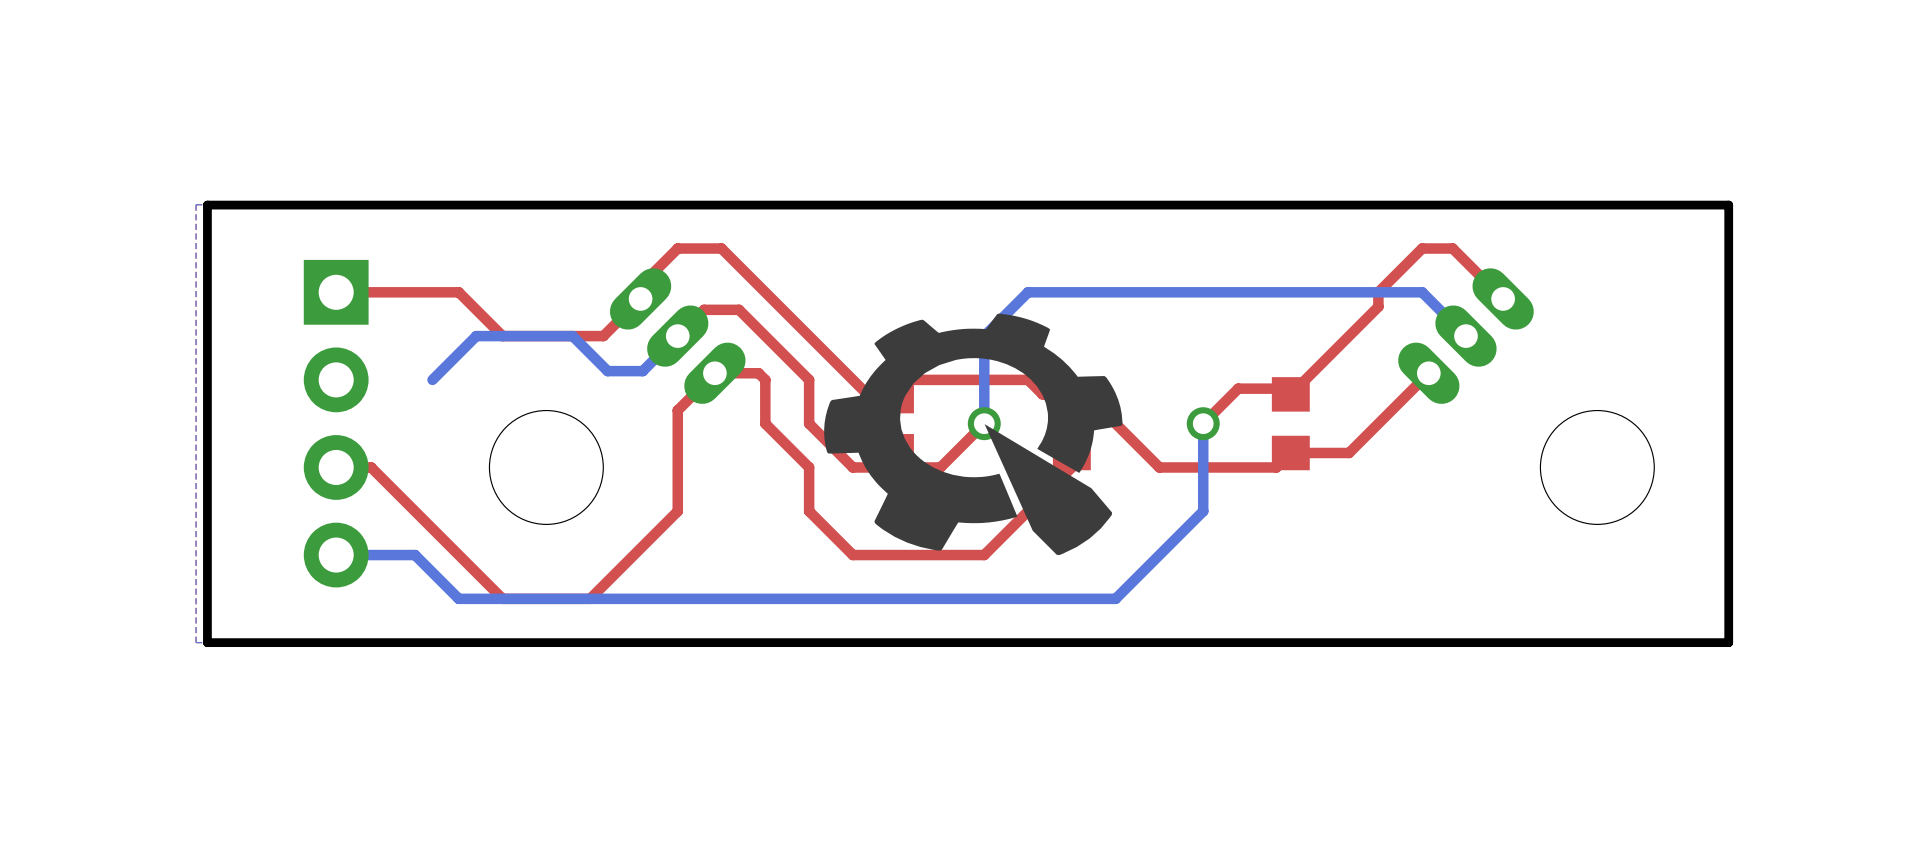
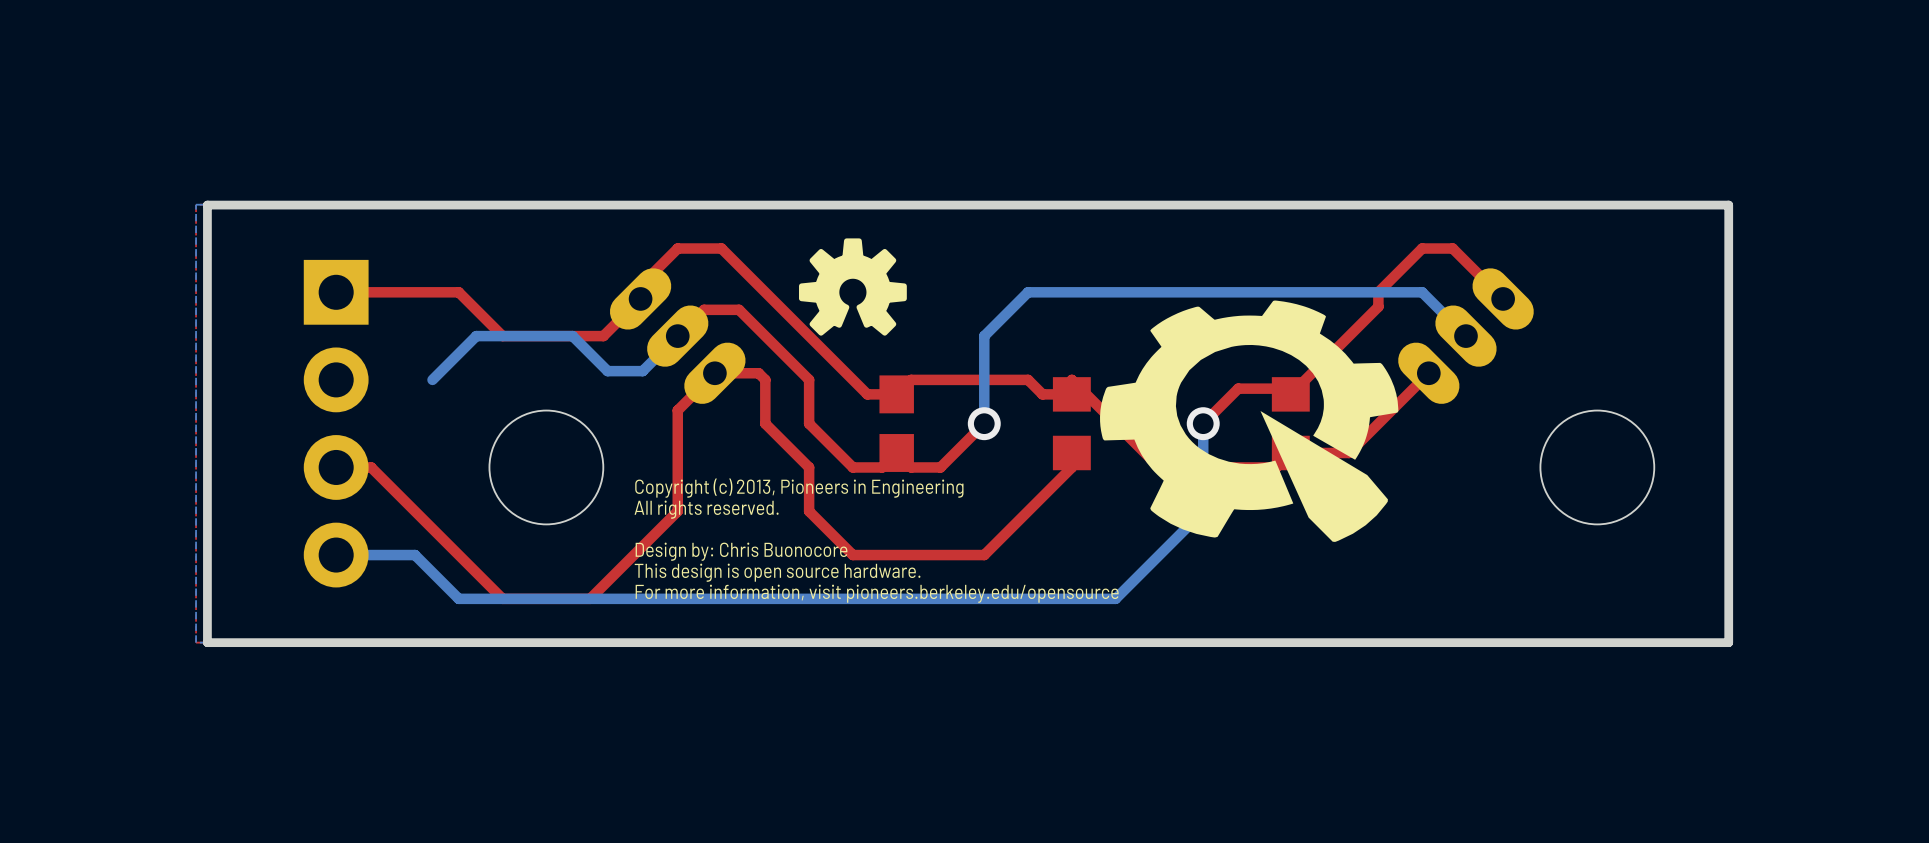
drawing: none -> [798, 238, 907, 336]
drawing position: (973, 434) -> (1249, 421)
text: none -> Copyright (c) 2013, Pioneers in Engineering (799, 488)
text: none -> All rights reserved. (706, 509)
text: none -> Design by: Chris Buonocore (741, 551)
text: none -> This design is open source hardware. (777, 572)
text: none -> For more information, visit pioneers.berkeley.edu/opensource (877, 593)

